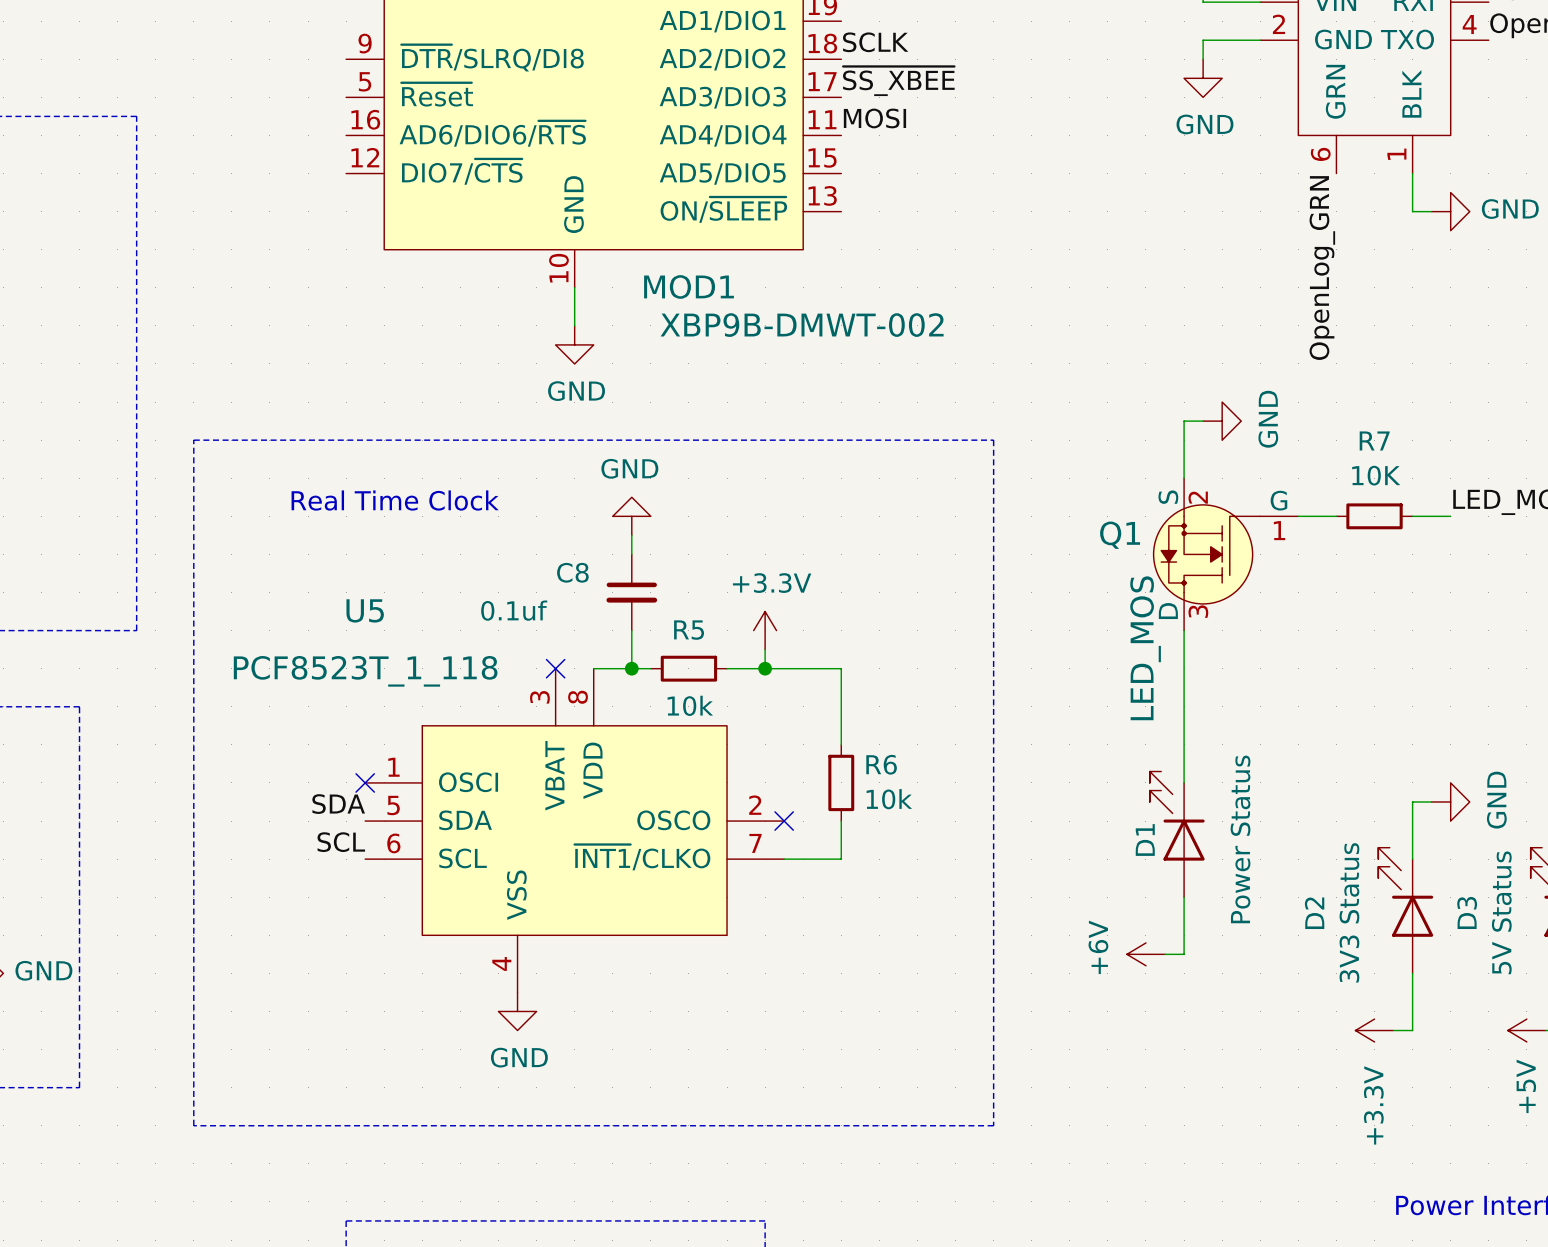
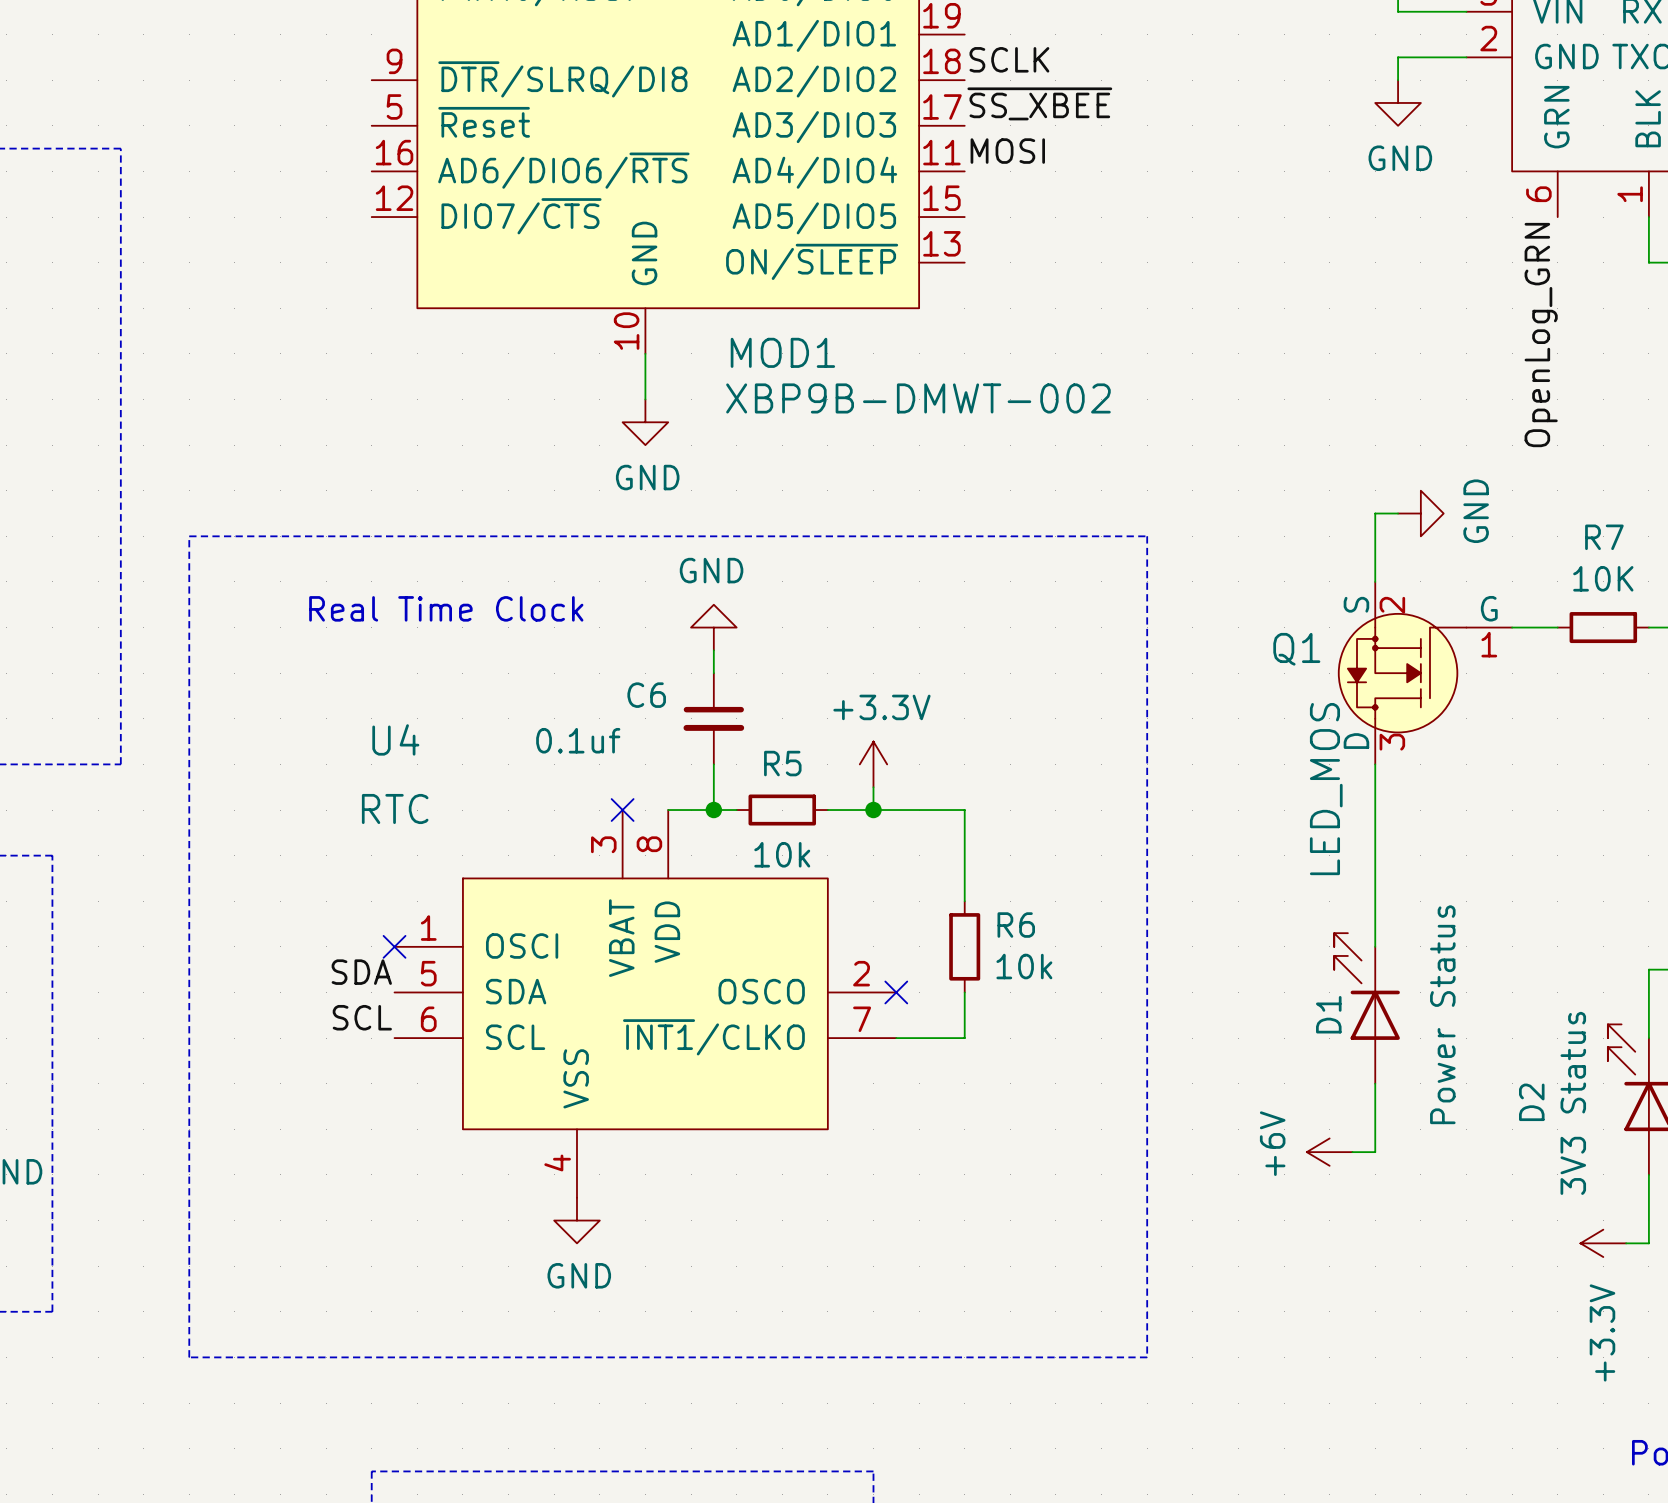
C8 name: C8 (572, 572) -> C6 (646, 695)
U5 name: U5 (365, 610) -> U4 (395, 739)
U5 value: PCF8523T_1_118 (365, 671) -> RTC (395, 808)

